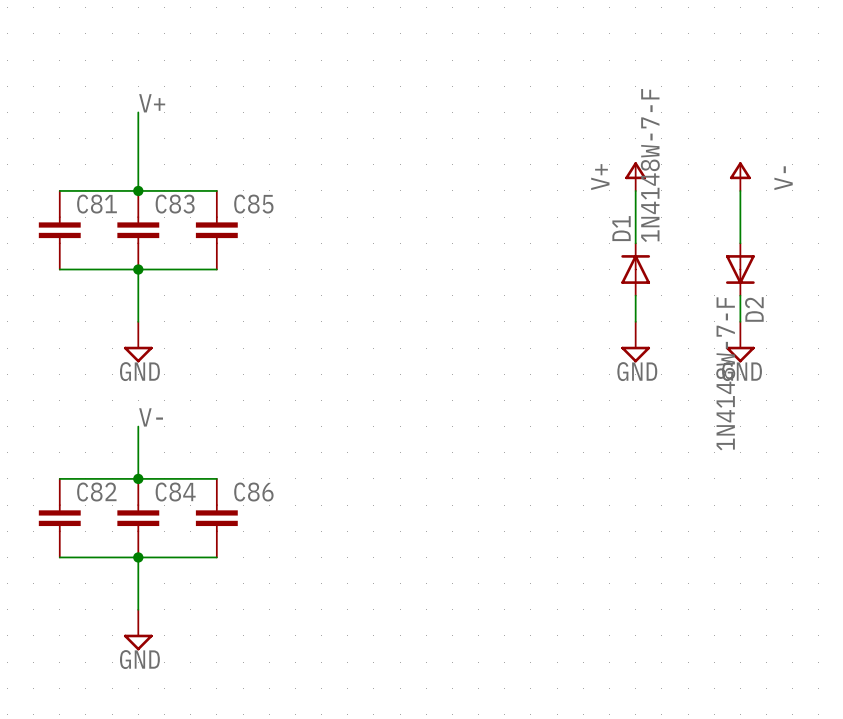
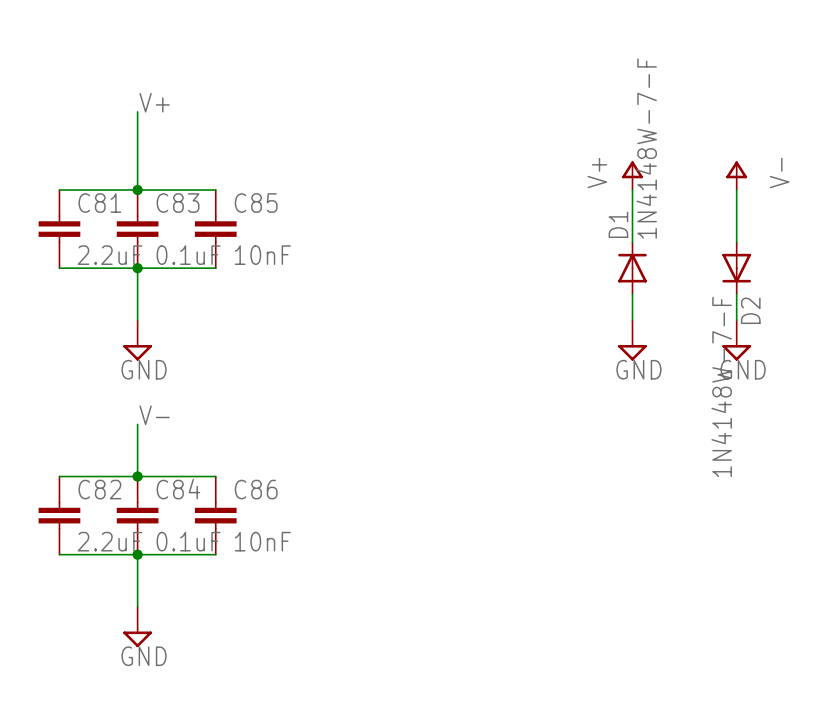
C81 value: none -> 2.2uF (110, 255)
C83 value: none -> 0.1uF (188, 255)
C85 value: none -> 10nF (262, 255)
C82 value: none -> 2.2uF (110, 541)
C84 value: none -> 0.1uF (188, 541)
C86 value: none -> 10nF (262, 541)

